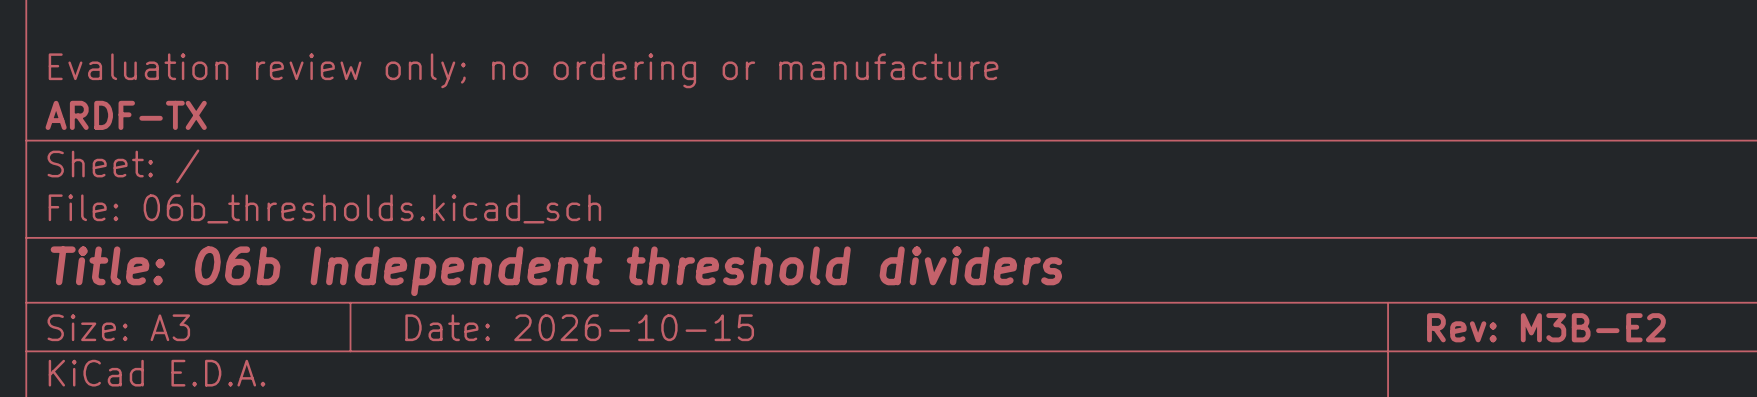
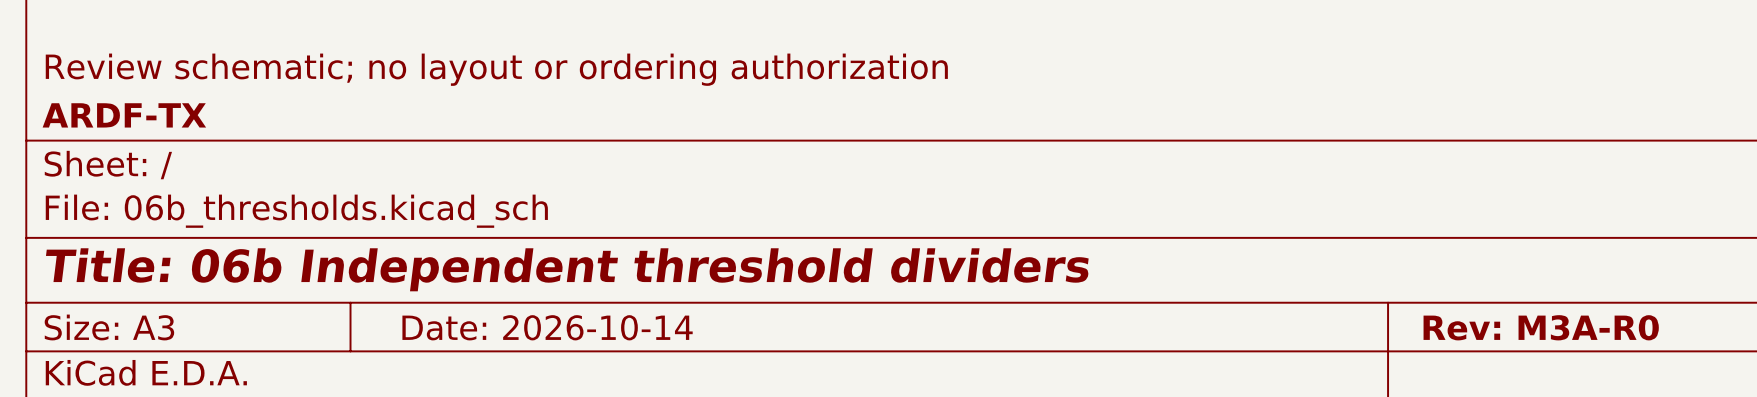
title block: Evaluation review only; no ordering or manufacture (523, 70) -> Review schematic; no layout or ordering authorization (496, 69)
title block: Date: 2026-10-15 (579, 327) -> Date: 2026-10-14 (547, 327)
title block: Rev: M3B-E2 (1546, 327) -> Rev: M3A-R0 (1541, 327)

